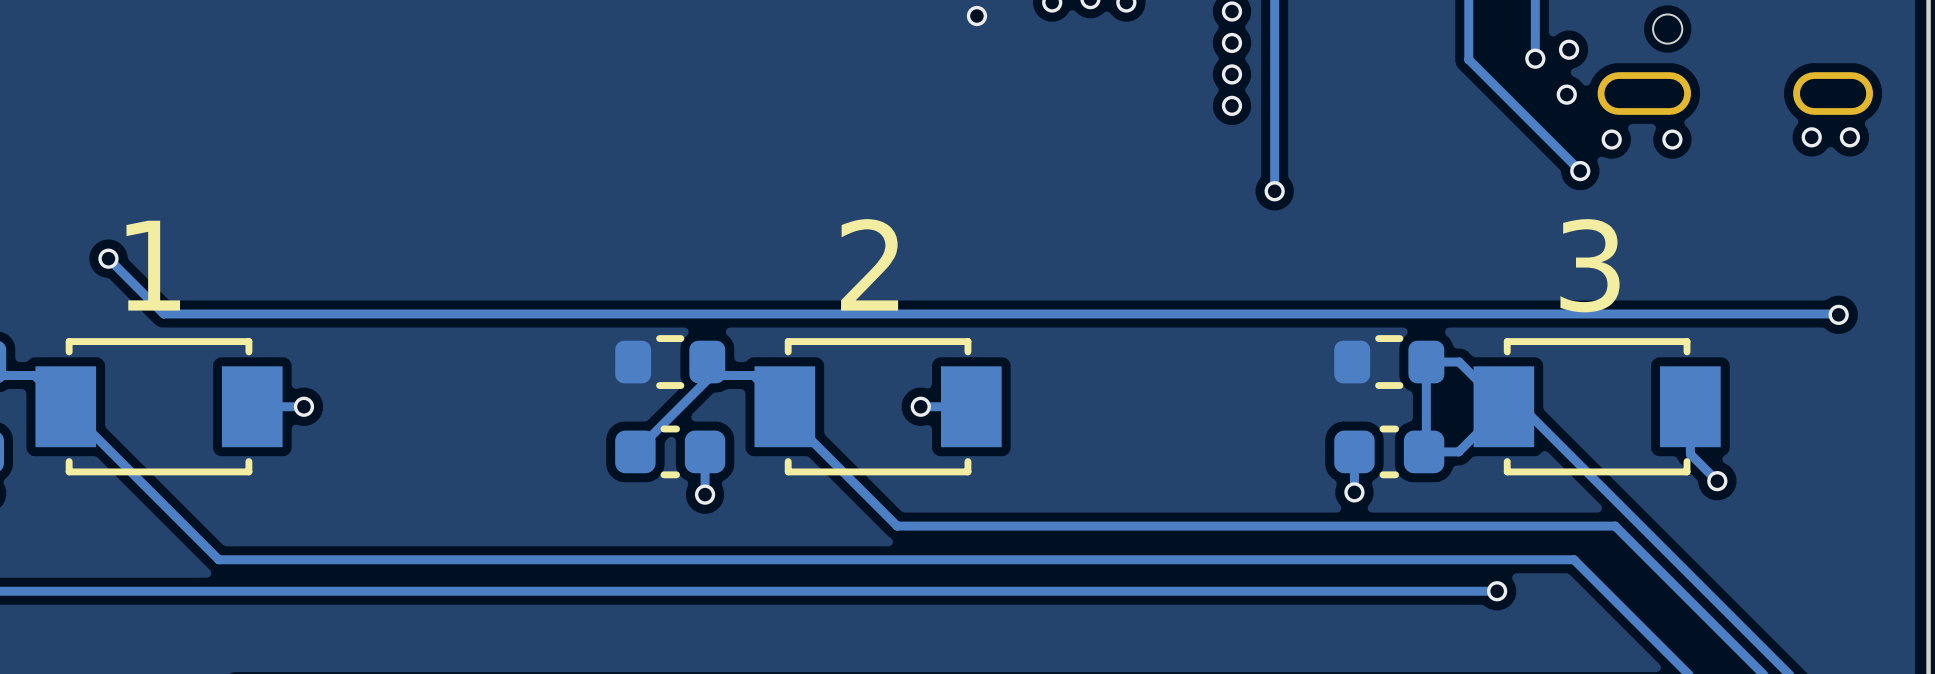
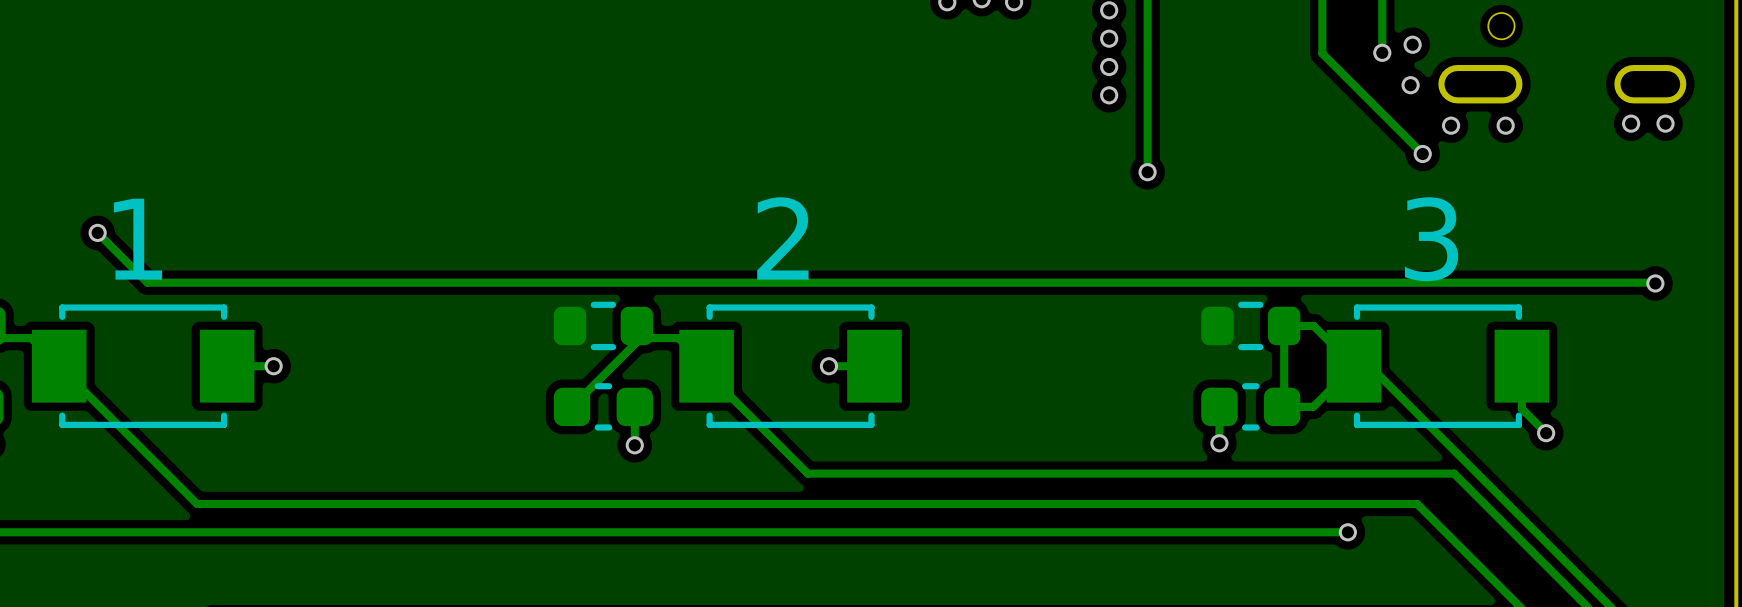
via: (976, 15) -> none

